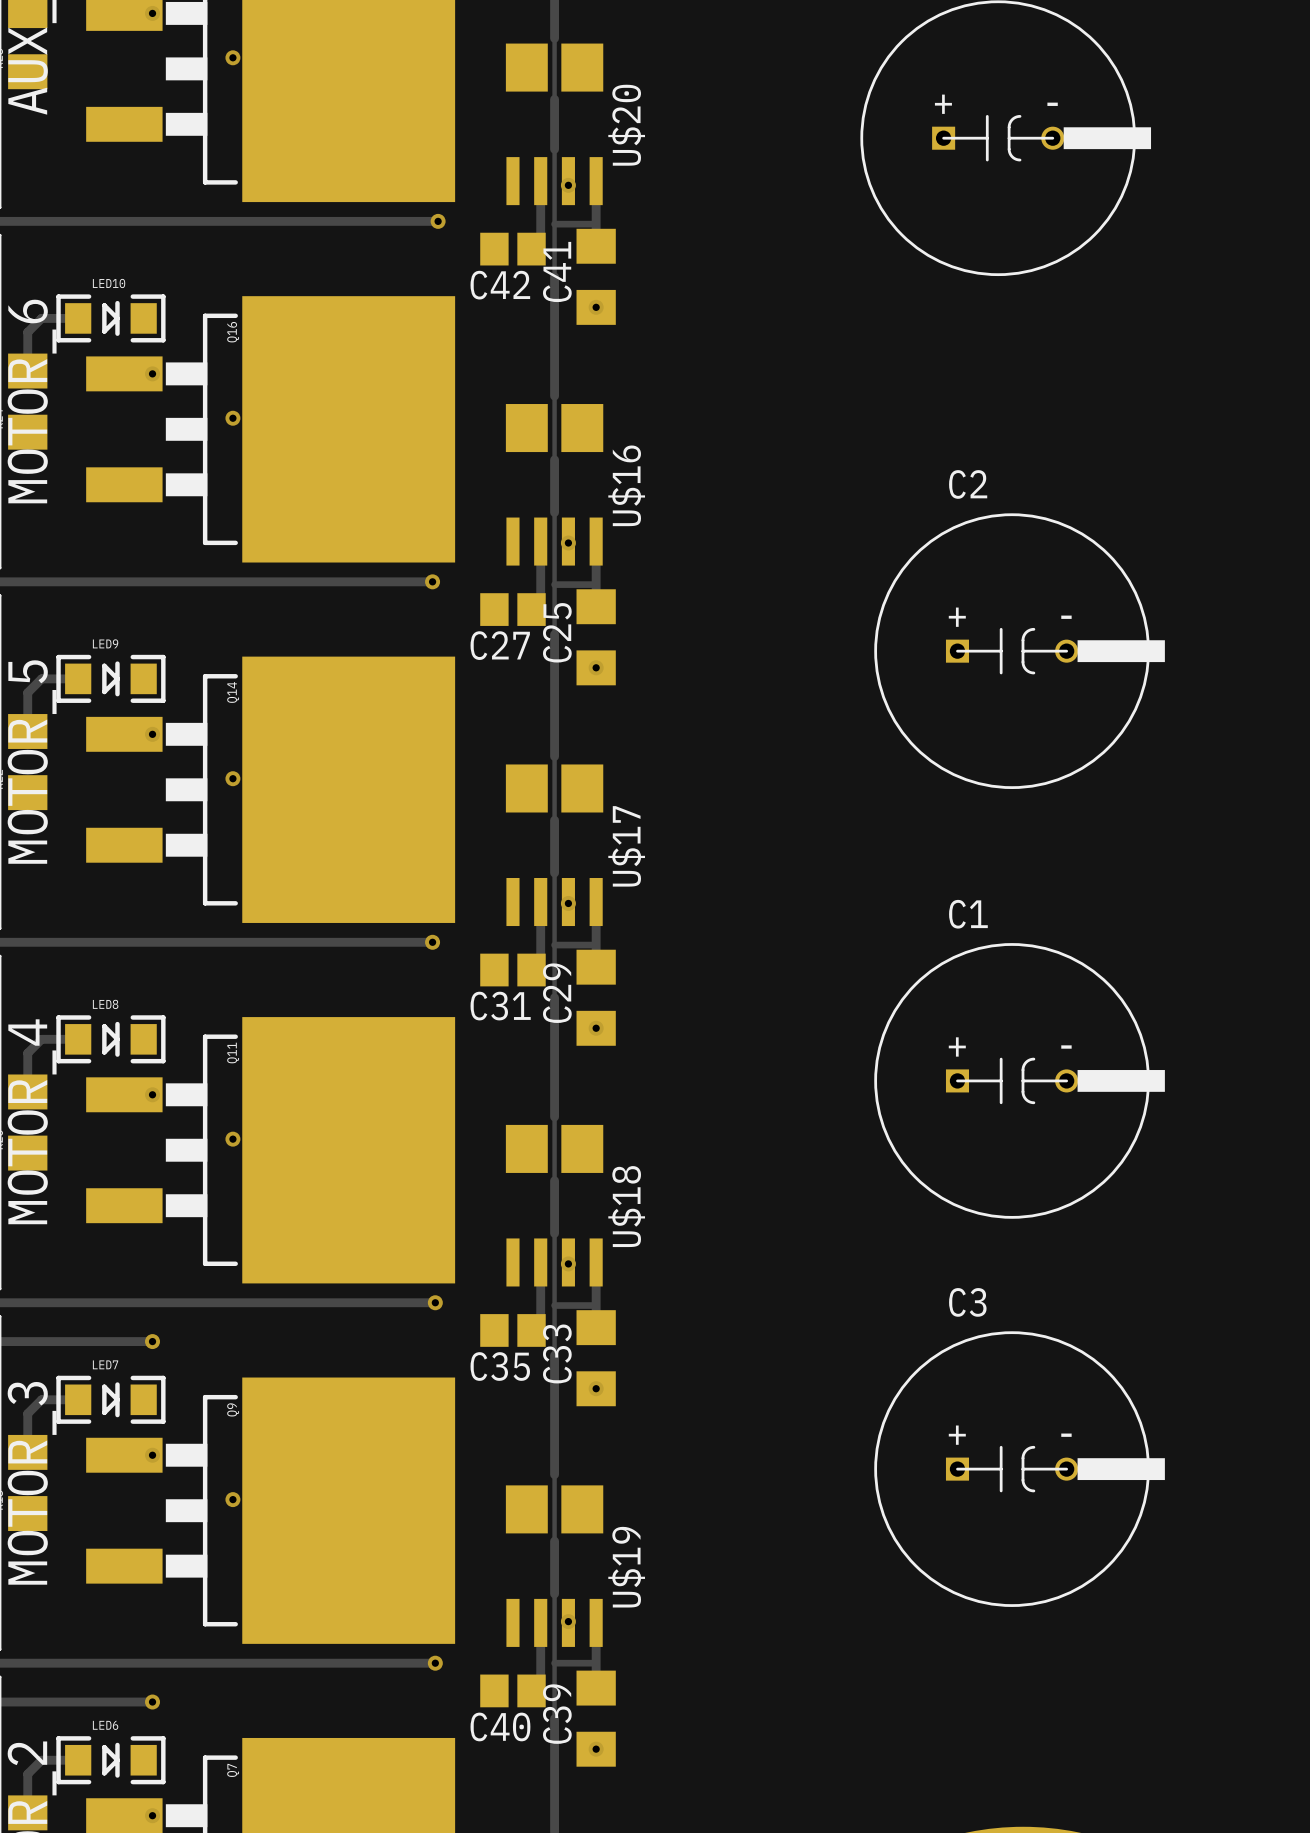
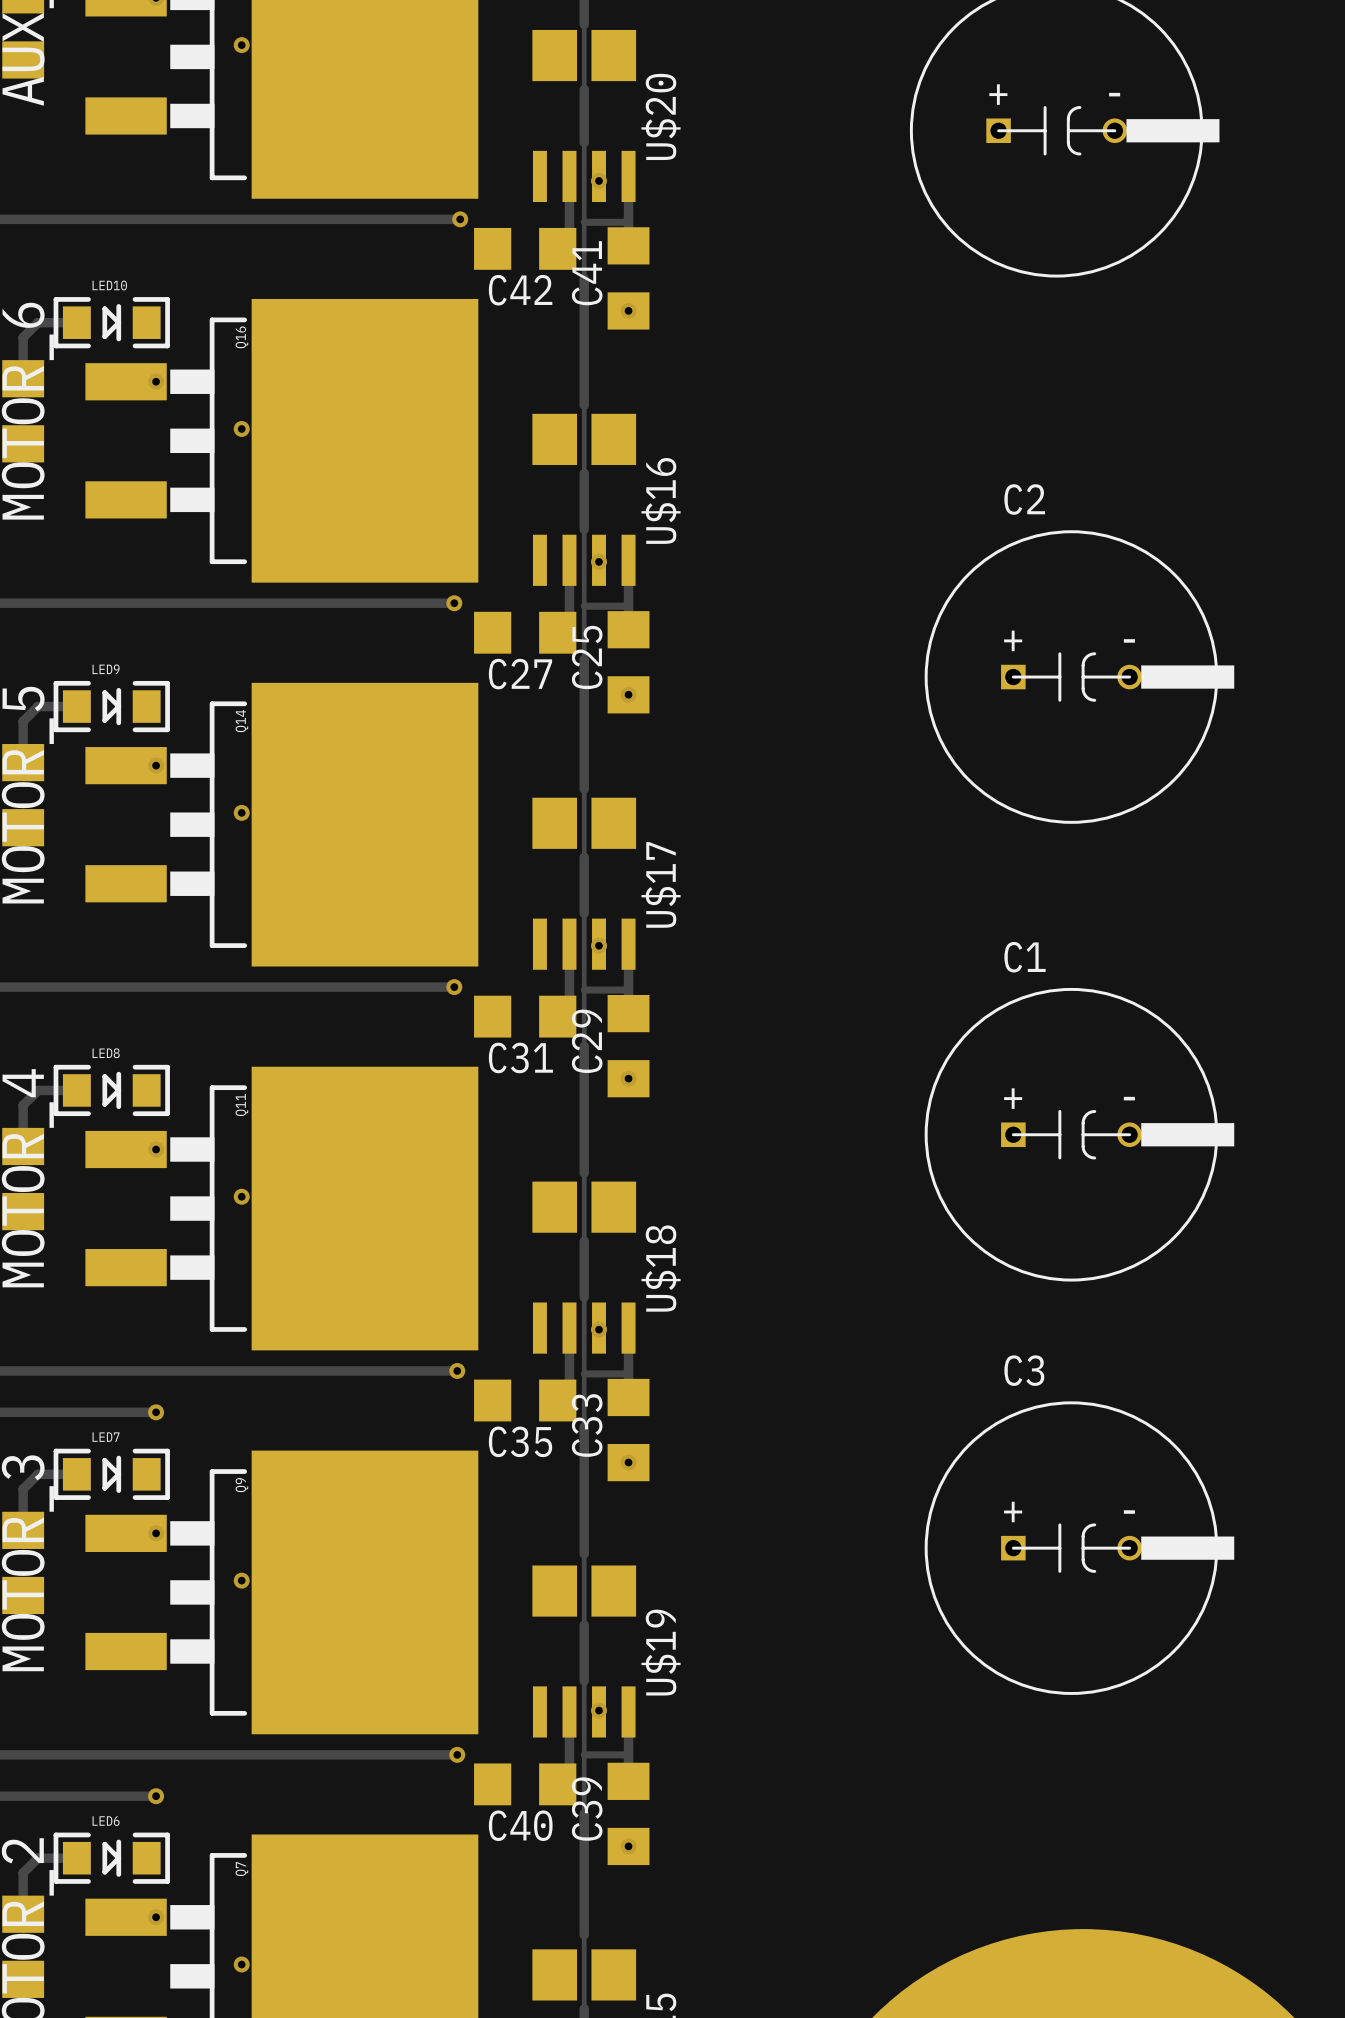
C42 footprint: [480, 232, 546, 266] -> [474, 227, 577, 270]
C27 footprint: [480, 593, 546, 626] -> [474, 611, 577, 654]
C31 footprint: [480, 953, 546, 987] -> [474, 995, 577, 1038]
C35 footprint: [480, 1314, 546, 1347] -> [474, 1379, 577, 1422]
C40 footprint: [480, 1674, 546, 1708] -> [474, 1763, 577, 1806]

